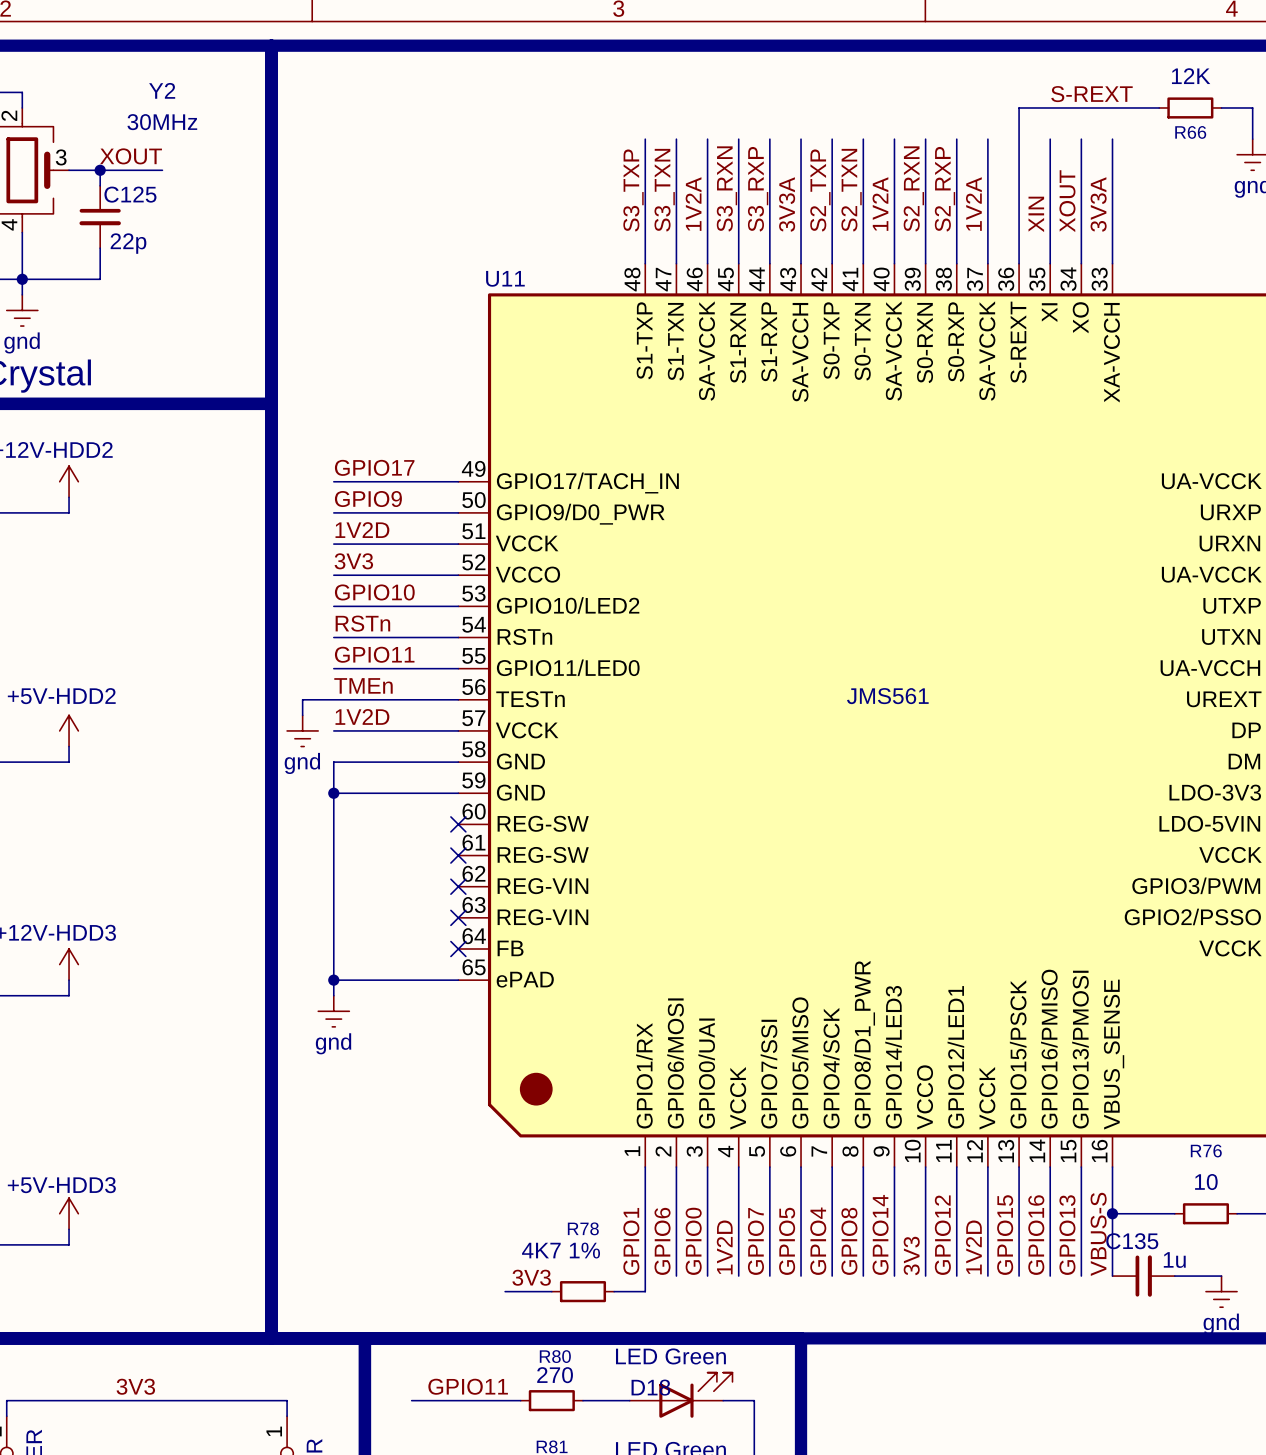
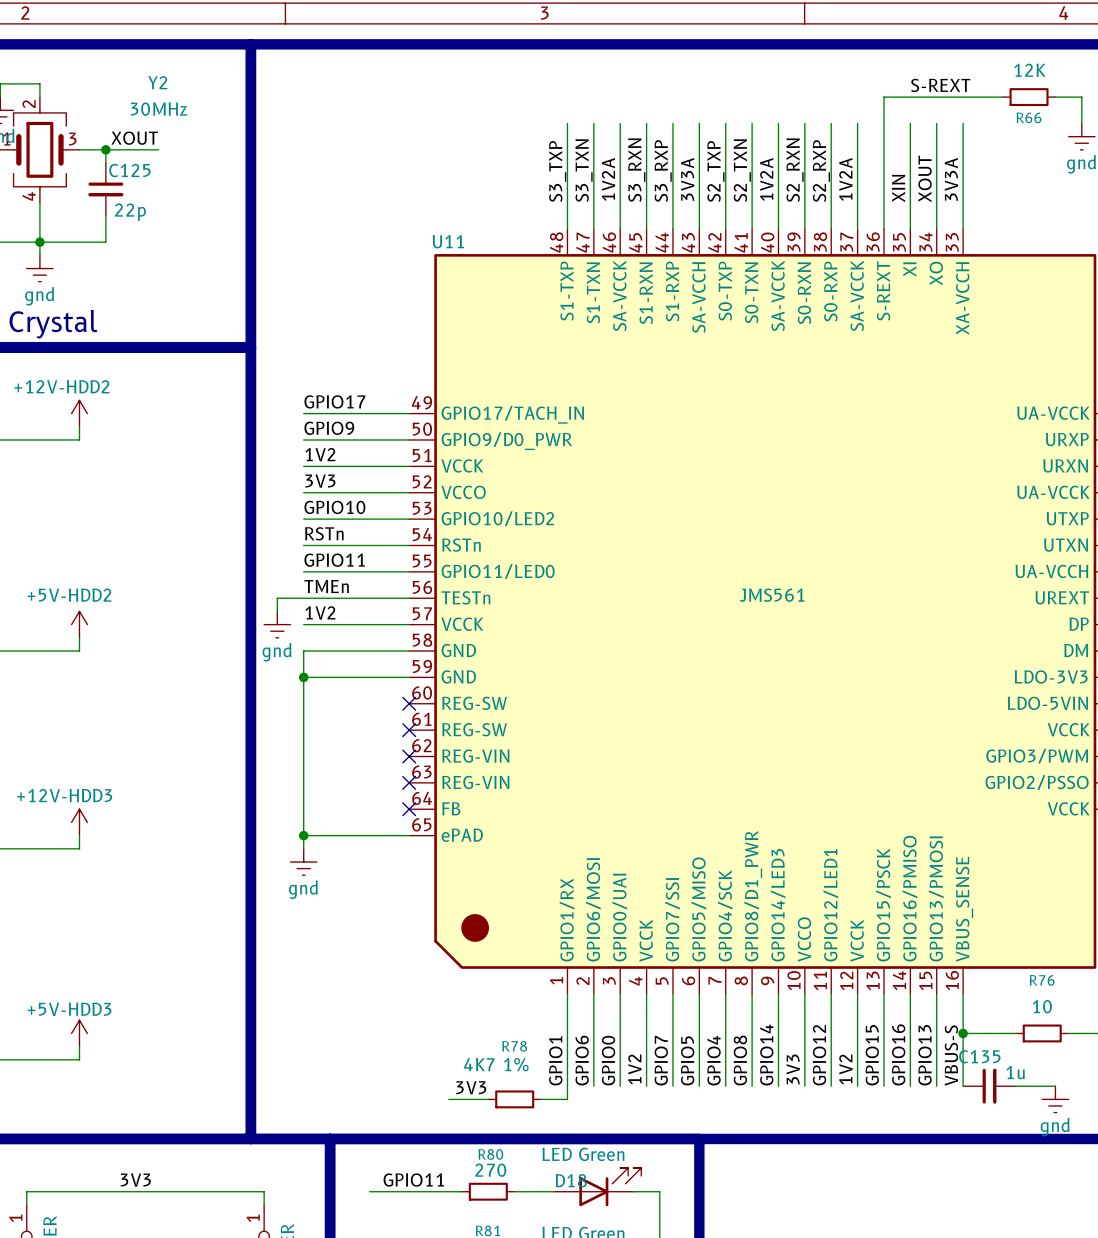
label: 1V2D (362, 530) -> 1V2 (320, 454)
label: 1V2D (362, 716) -> 1V2 (320, 612)
label: 1V2D (724, 1247) -> 1V2 (634, 1069)
label: 1V2D (973, 1247) -> 1V2 (845, 1069)

